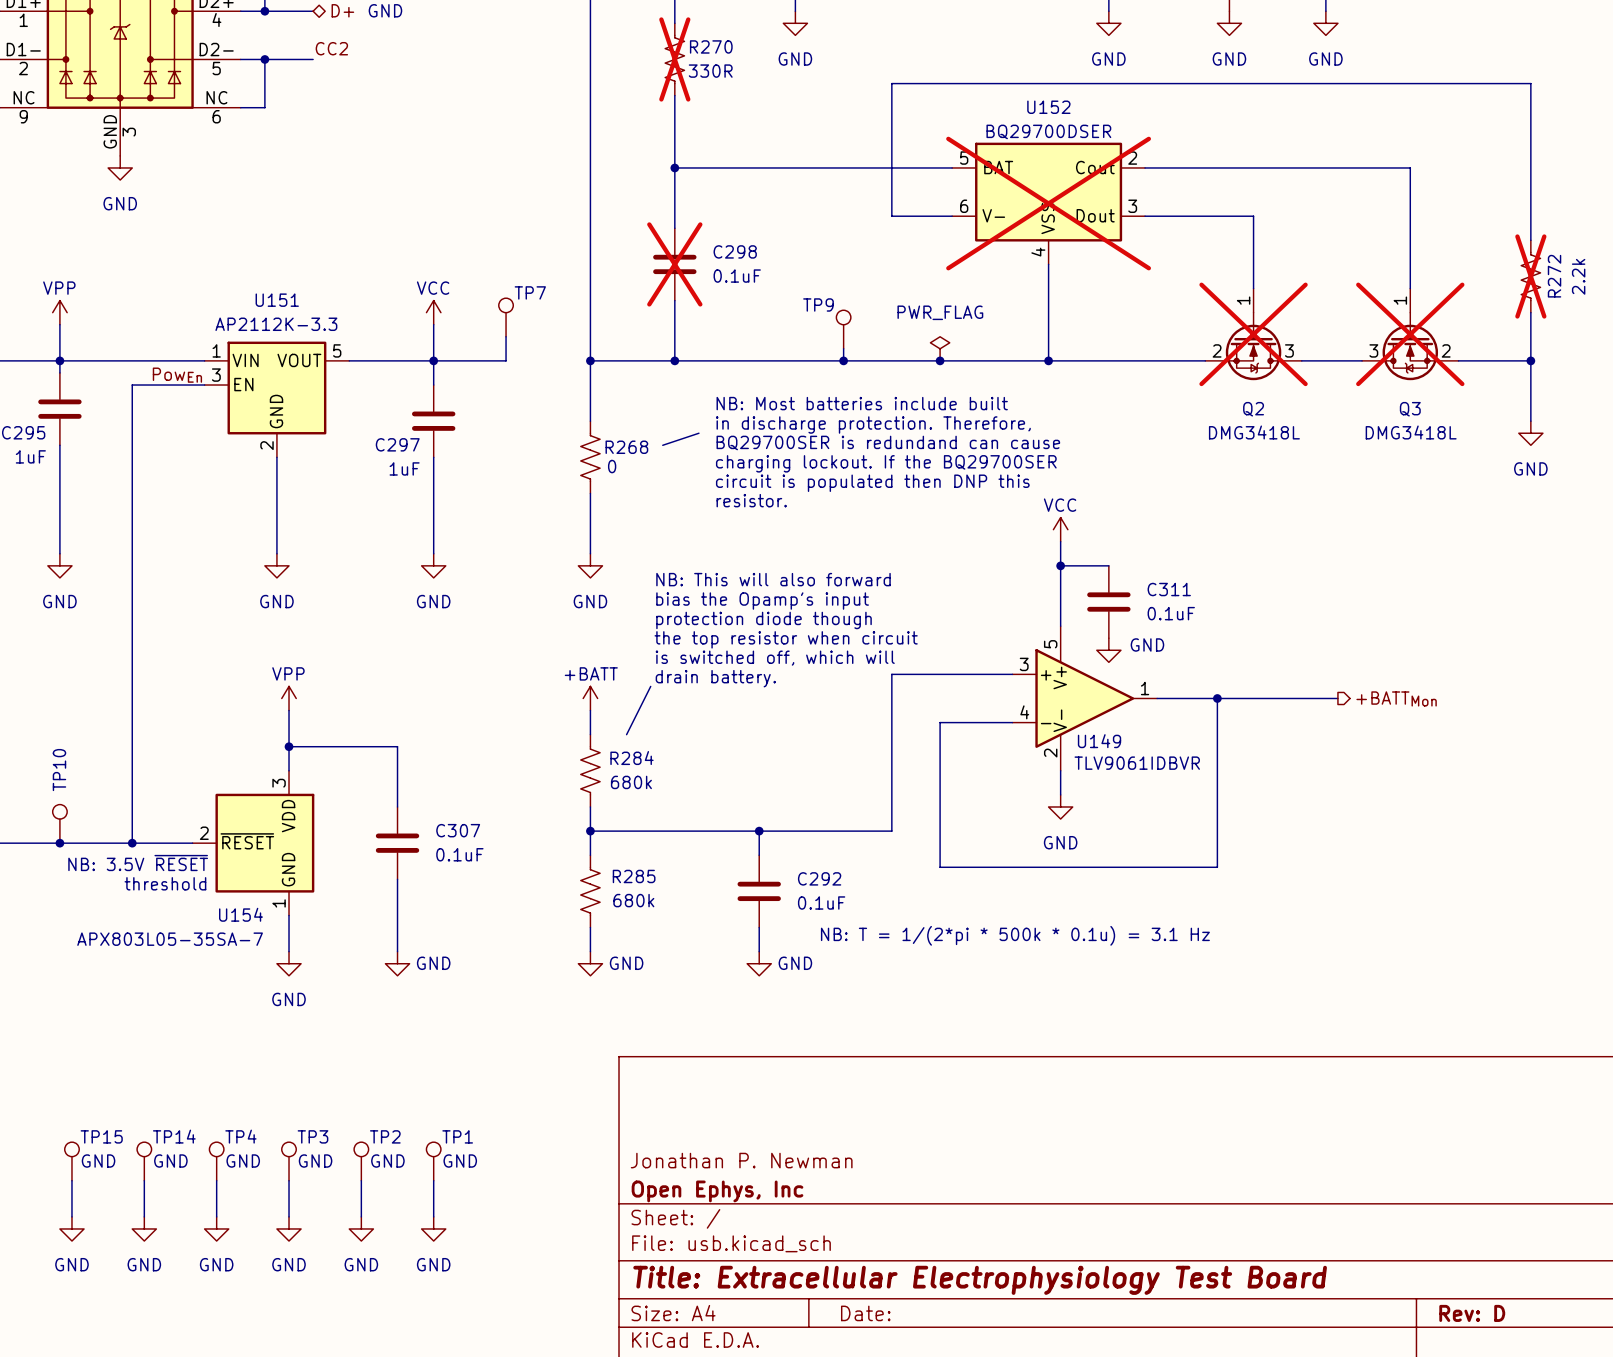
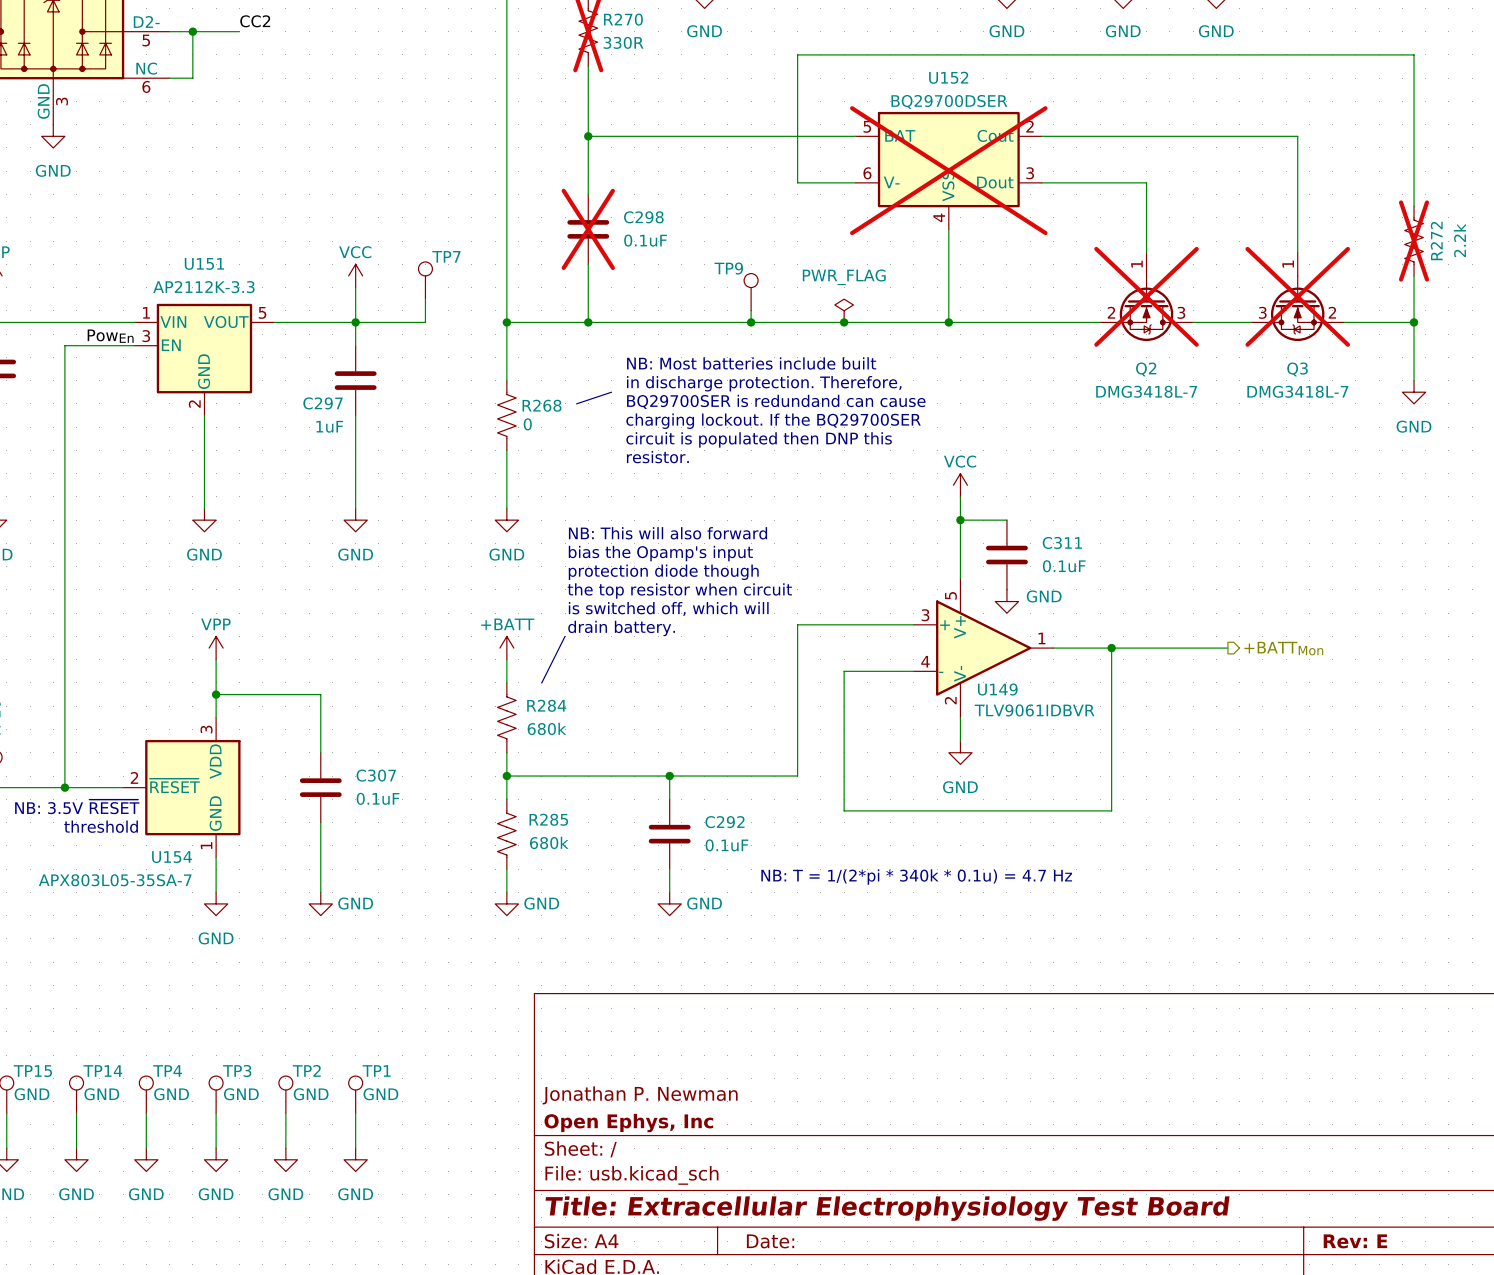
Q2 value: DMG3418L (1254, 432) -> DMG3418L-7 (1146, 391)
Q3 value: DMG3418L (1411, 432) -> DMG3418L-7 (1297, 391)
text: NB: T = 1/(2*pi * 500k * 0.1u) = 3.1 Hz (1015, 935) -> NB: T = 1/(2*pi * 340k * 0.1u) = 4.7 Hz (916, 877)
title block: Rev: D (1472, 1313) -> Rev: E (1355, 1241)

